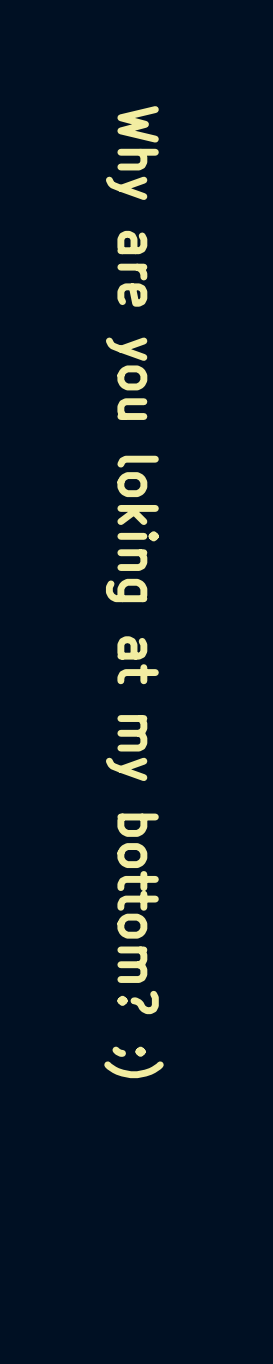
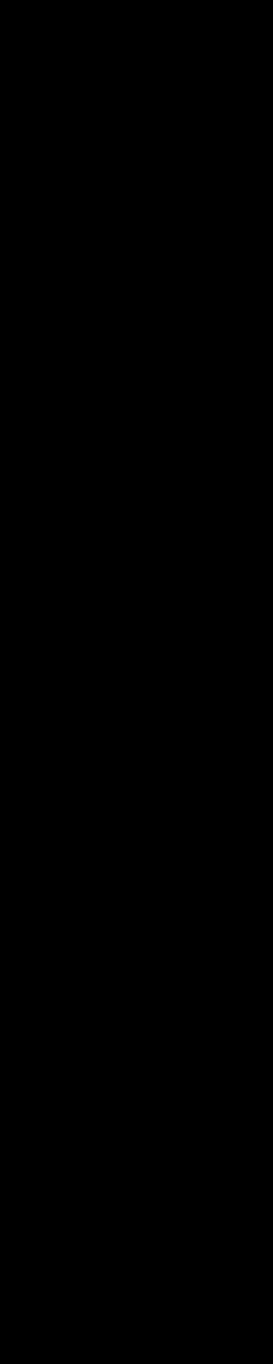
text: Why are you loking at my bottom? ;) (134, 592) -> none

